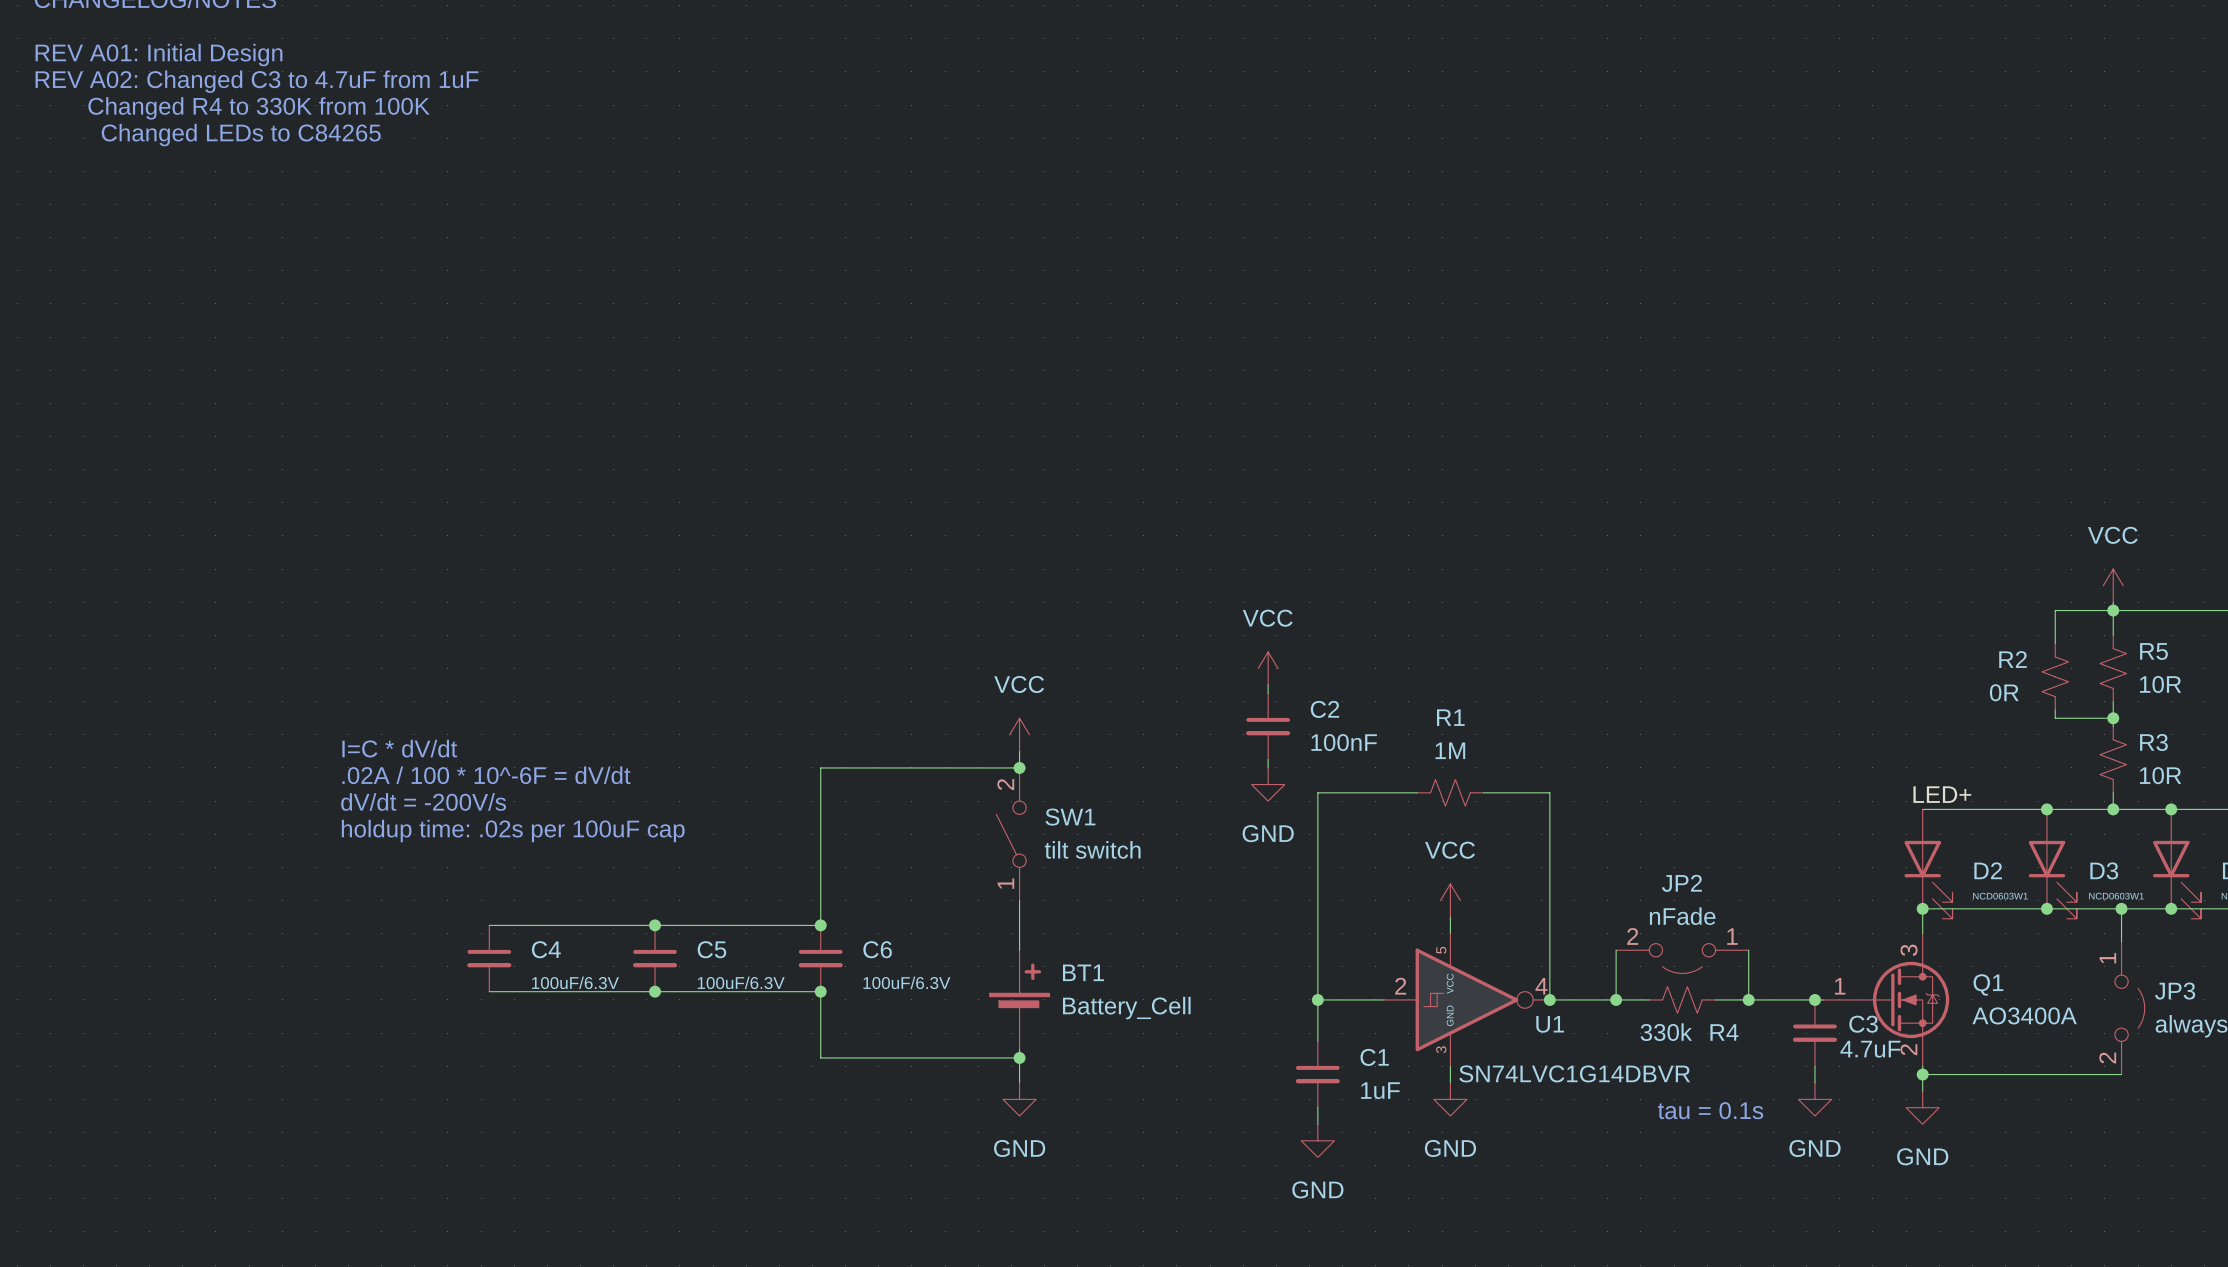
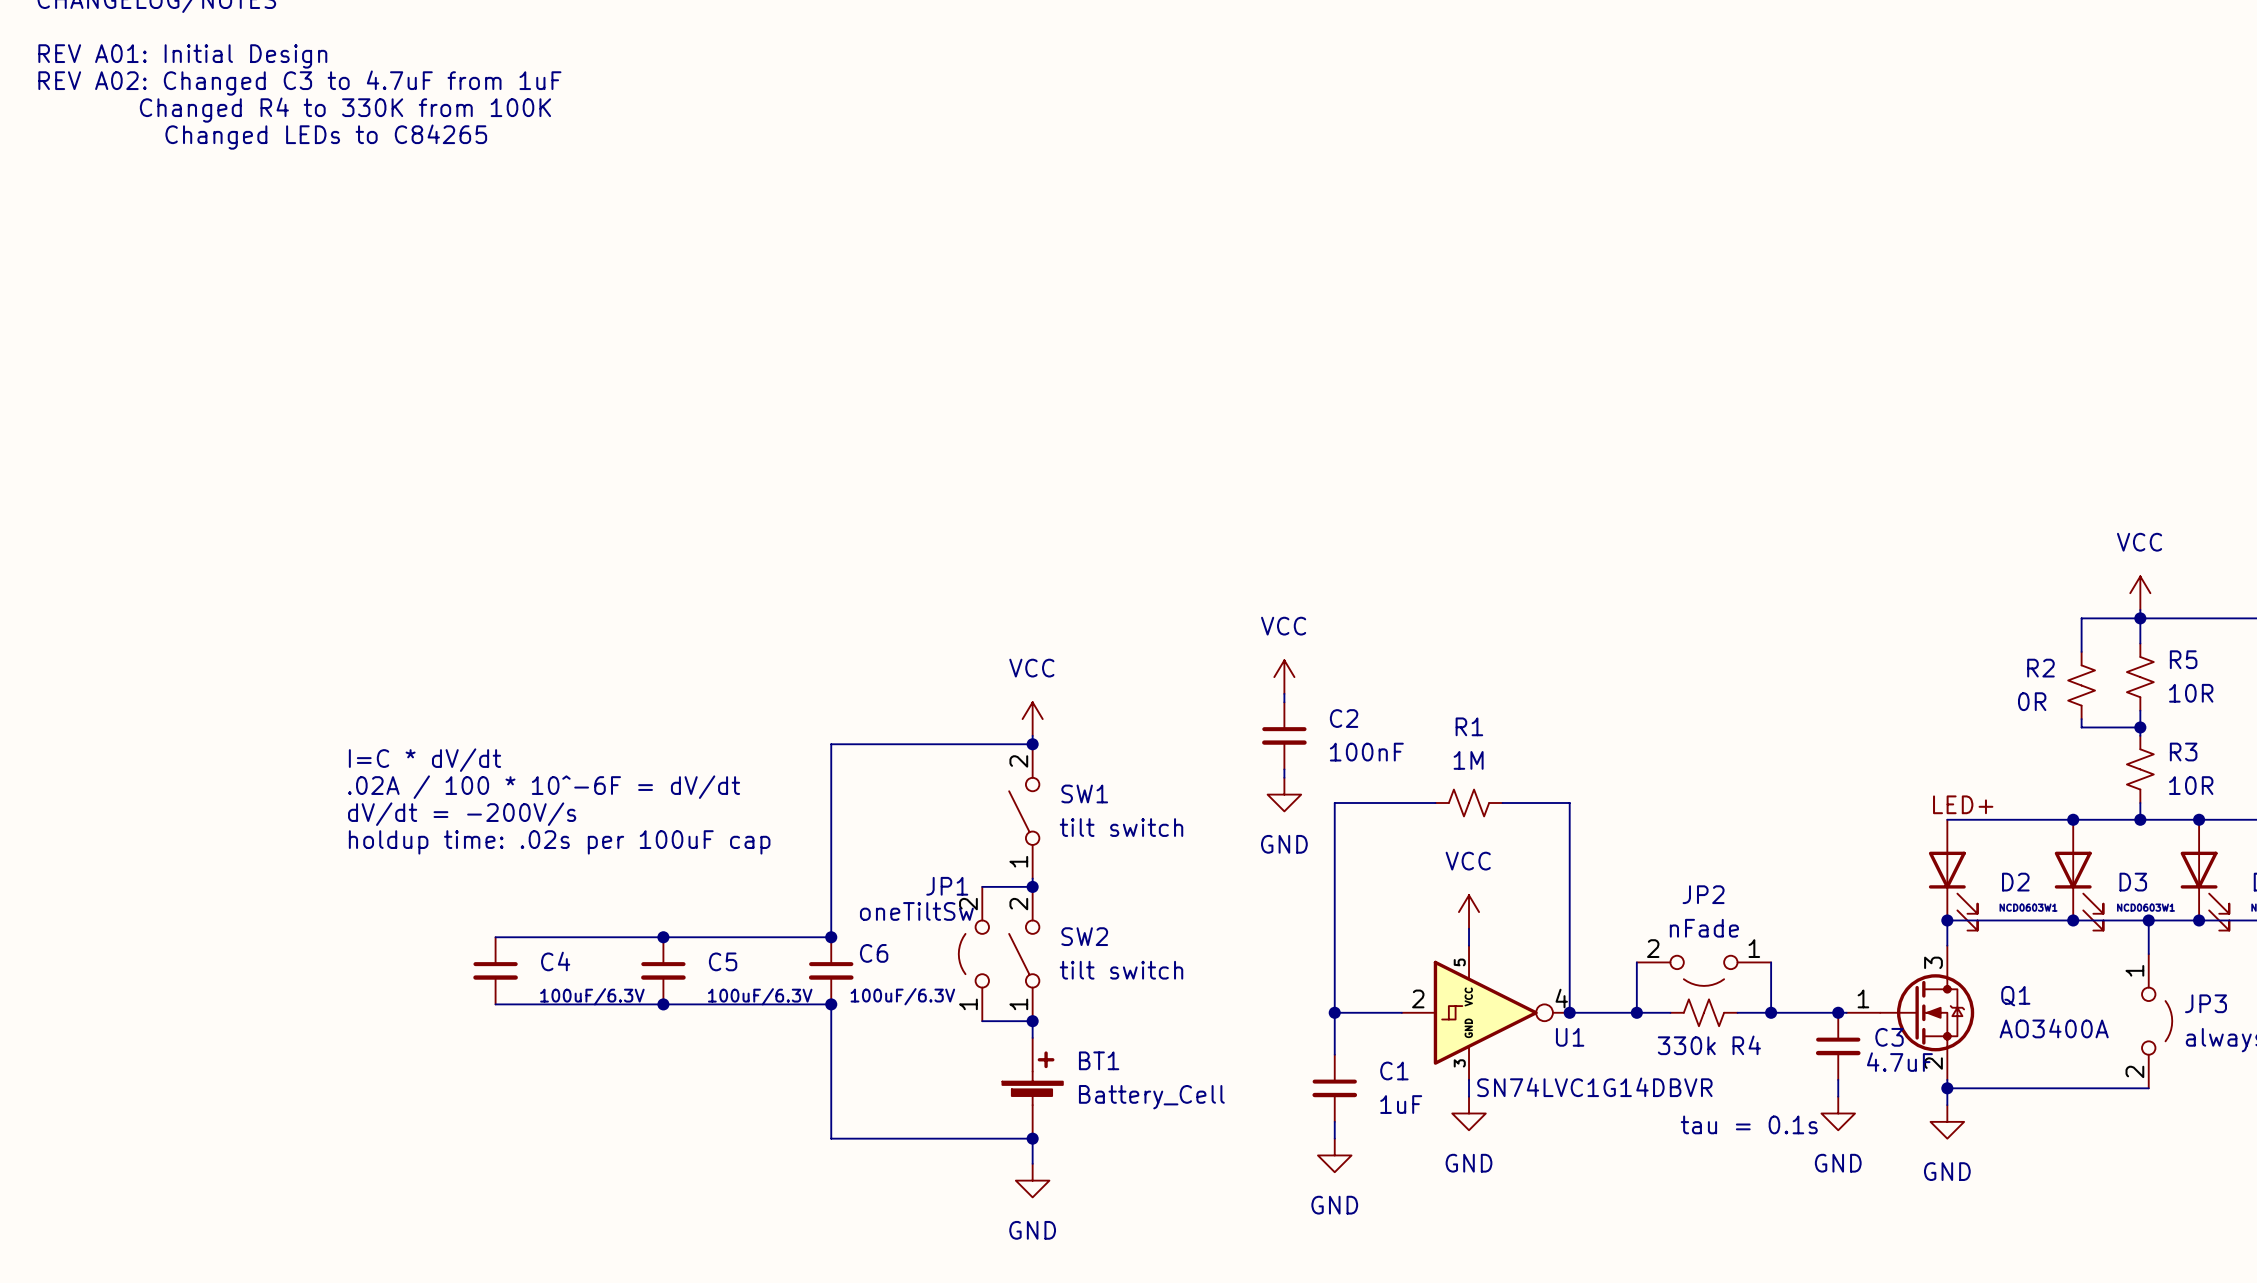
power symbol position: VCC (1019, 734) -> VCC (1032, 719)
wire: (1019, 751) (1019, 767) (820, 767) -> (1032, 735) (1032, 744) (831, 744) (831, 777)
junction position: (1019, 767) -> (1032, 744)
SW1 position: (1011, 834) -> (1024, 811)
wire: none -> (1032, 878) (1032, 886) (982, 886)
junction: none -> (1032, 886)
wire: (1019, 900) (1019, 950) -> none
JP1: none -> oneTiltSw (973, 954)
SW2: none -> tilt switch (1024, 954)
C6 name position: C6 (877, 949) -> C6 (874, 953)
C6 value position: 100uF/6.3V (906, 982) -> 100uF/6.3V (902, 996)
BT1 position: (1019, 999) -> (1032, 1088)
wire: none -> (982, 1021) (1032, 1021) (1032, 1037)
junction: none -> (1032, 1021)
wire: (820, 1057) (1019, 1057) -> (831, 1071) (831, 1138) (1032, 1138) (1032, 1163)
junction: (1019, 1057) -> none
power symbol position: GND (1019, 1099) -> GND (1032, 1180)
junction: none -> (1032, 1138)

